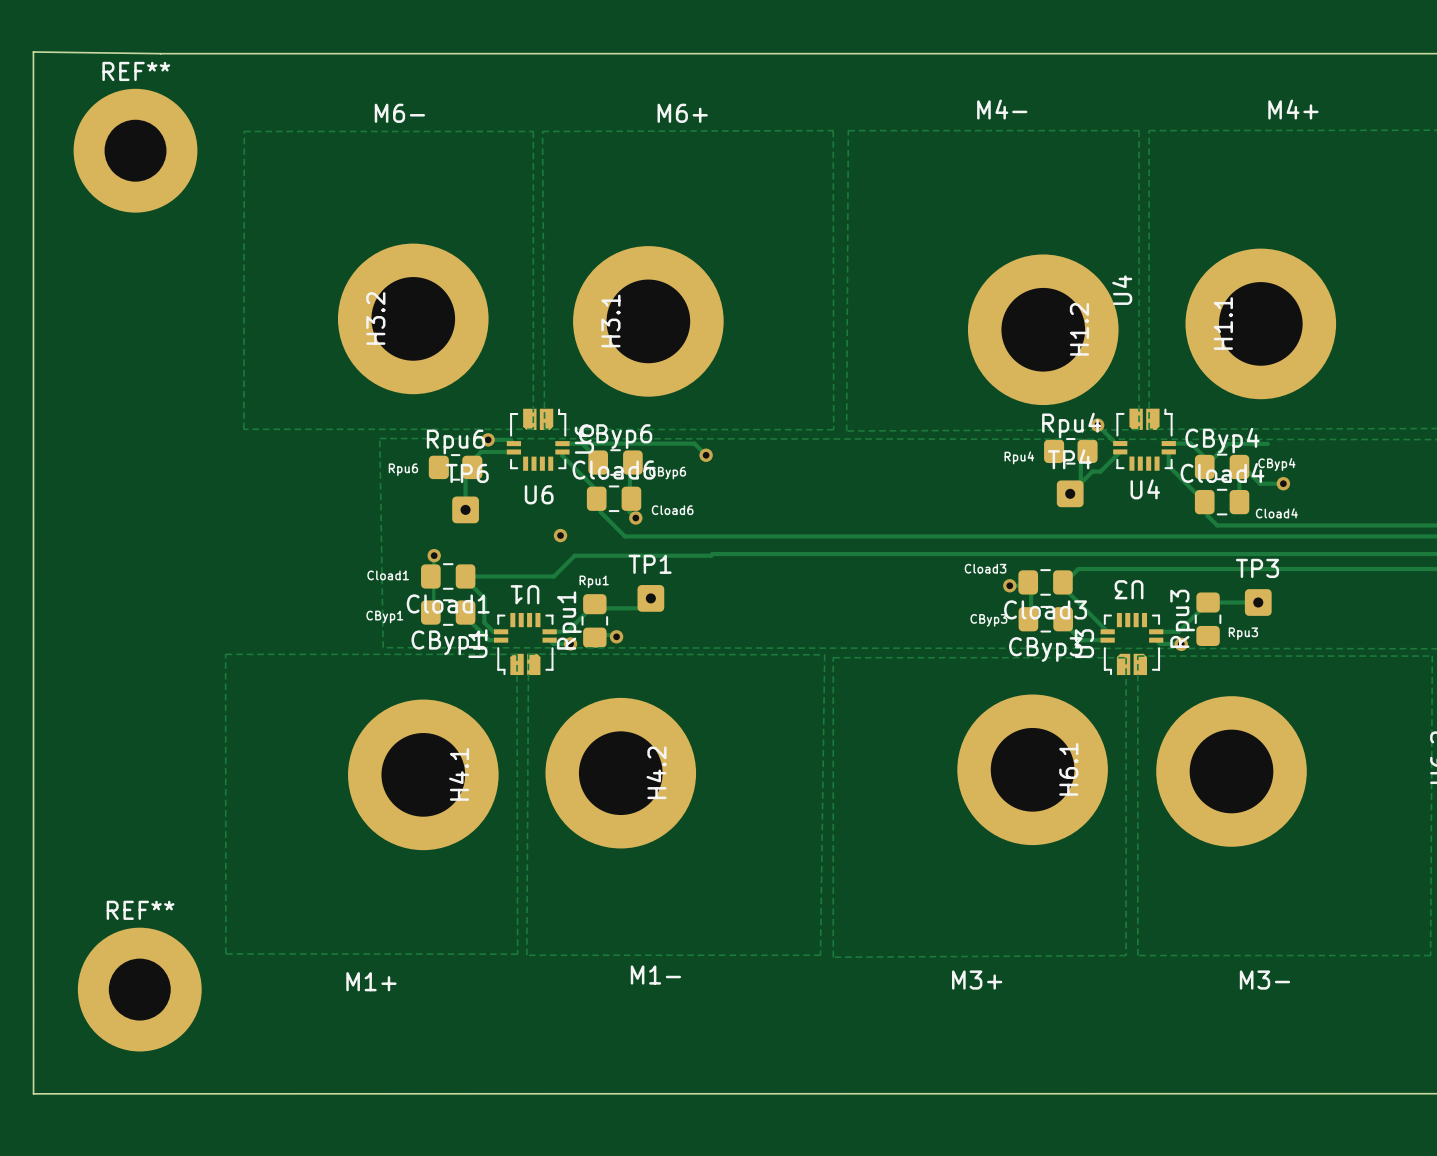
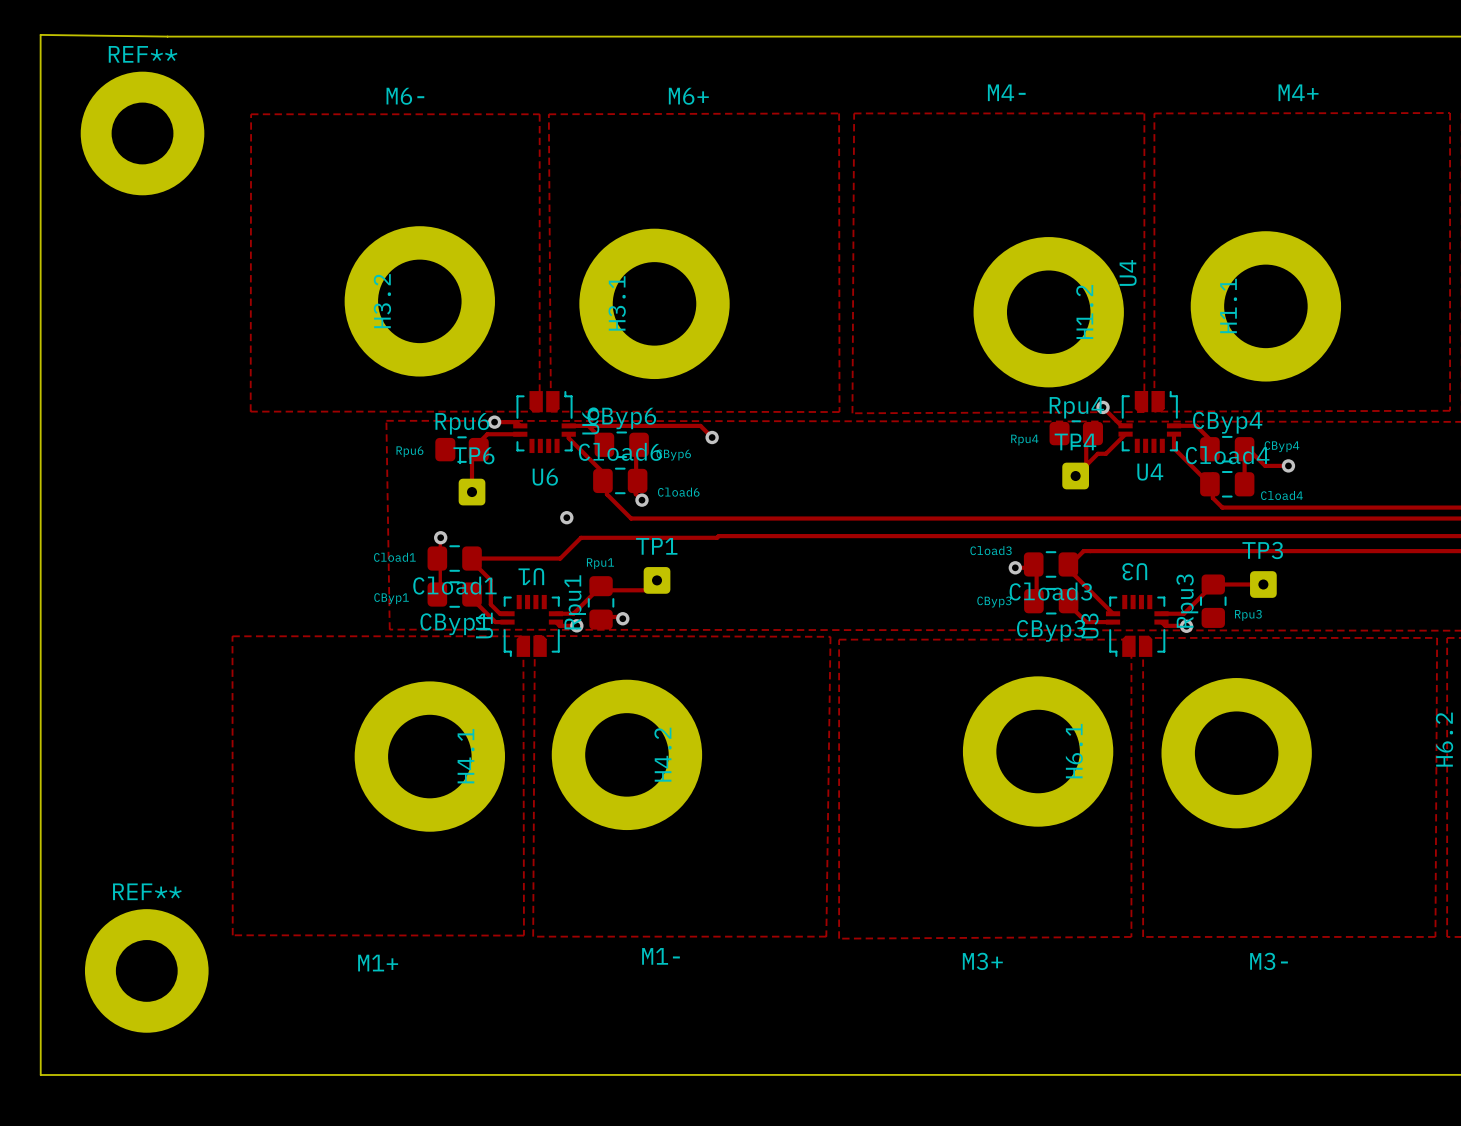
track: (1267, 443) (1227, 443) (1204, 466) -> none

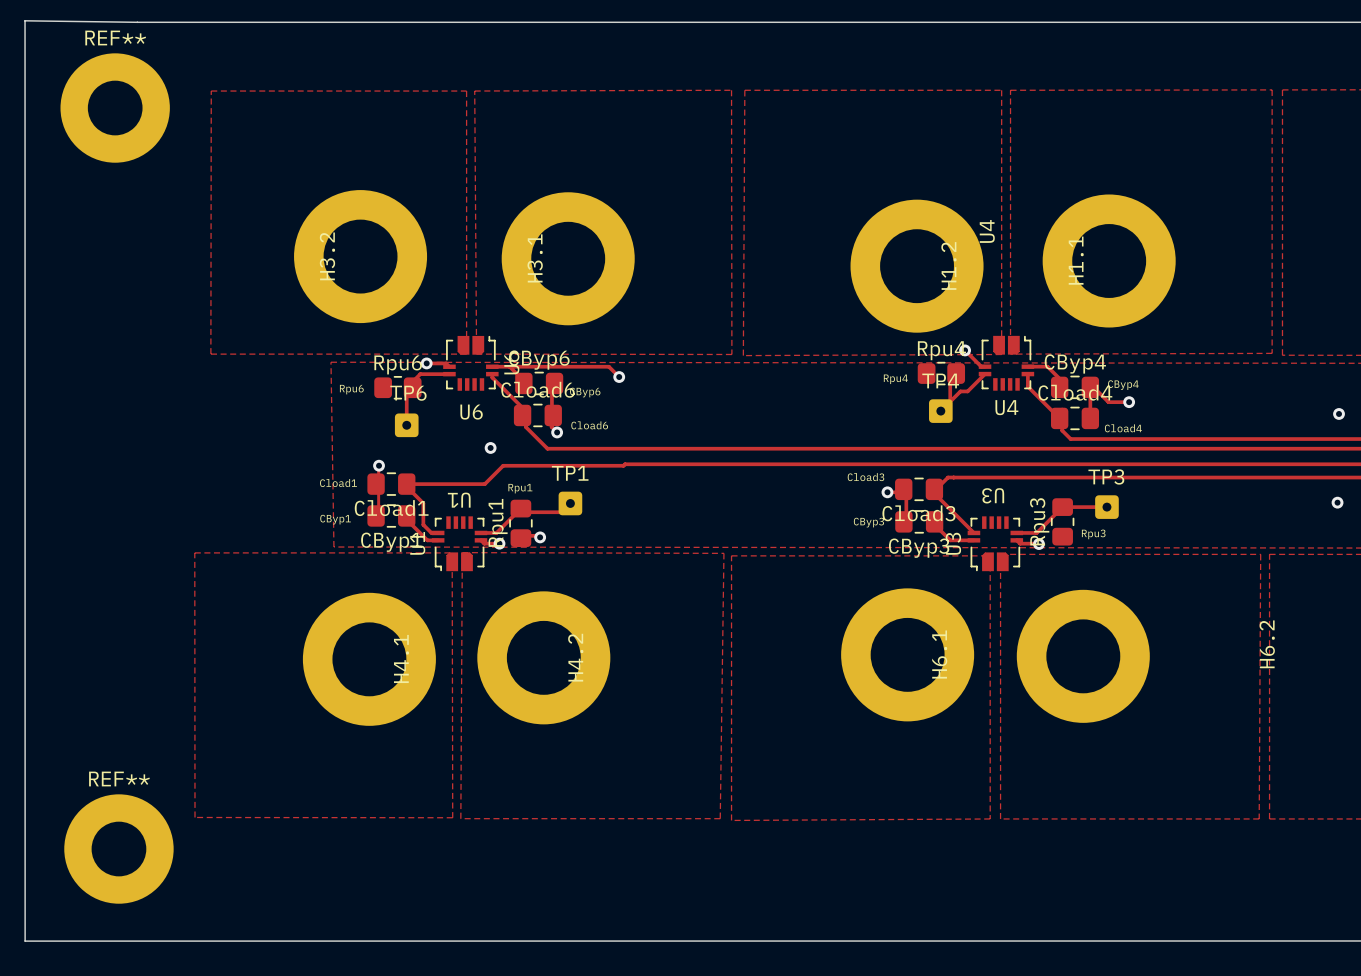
text: M4- (1006, 92) -> none
text: M4+ (1298, 92) -> none
text: M6- (405, 96) -> none
text: M6+ (688, 96) -> none
text: M1- (660, 956) -> none
text: M3+ (982, 961) -> none
text: M3- (1269, 961) -> none
text: M1+ (378, 963) -> none

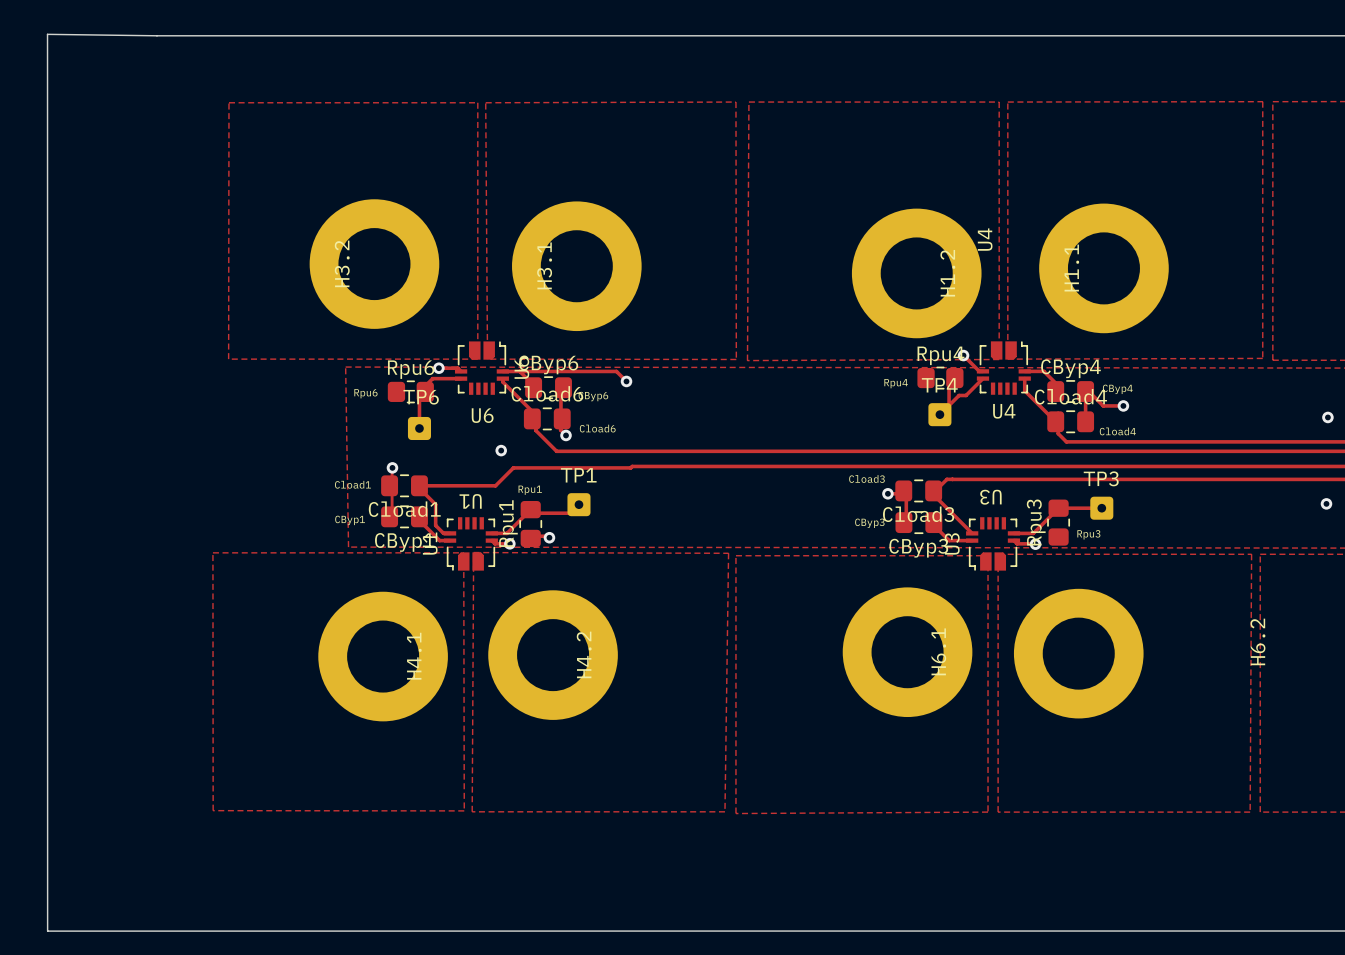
REF**: (115, 108) -> none
REF**: (118, 849) -> none

